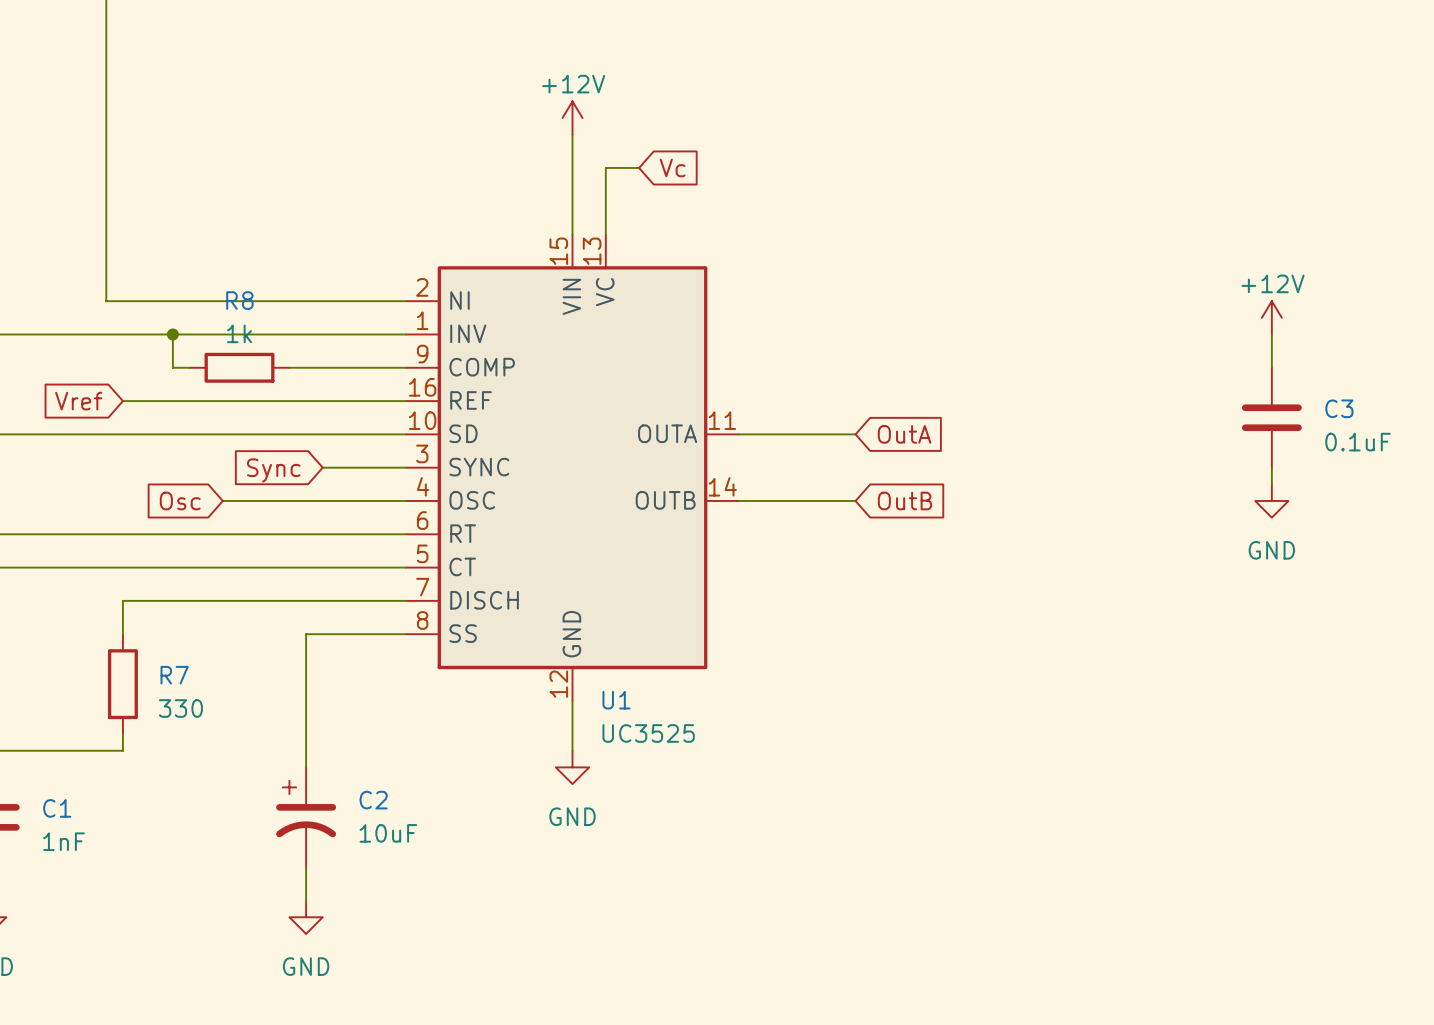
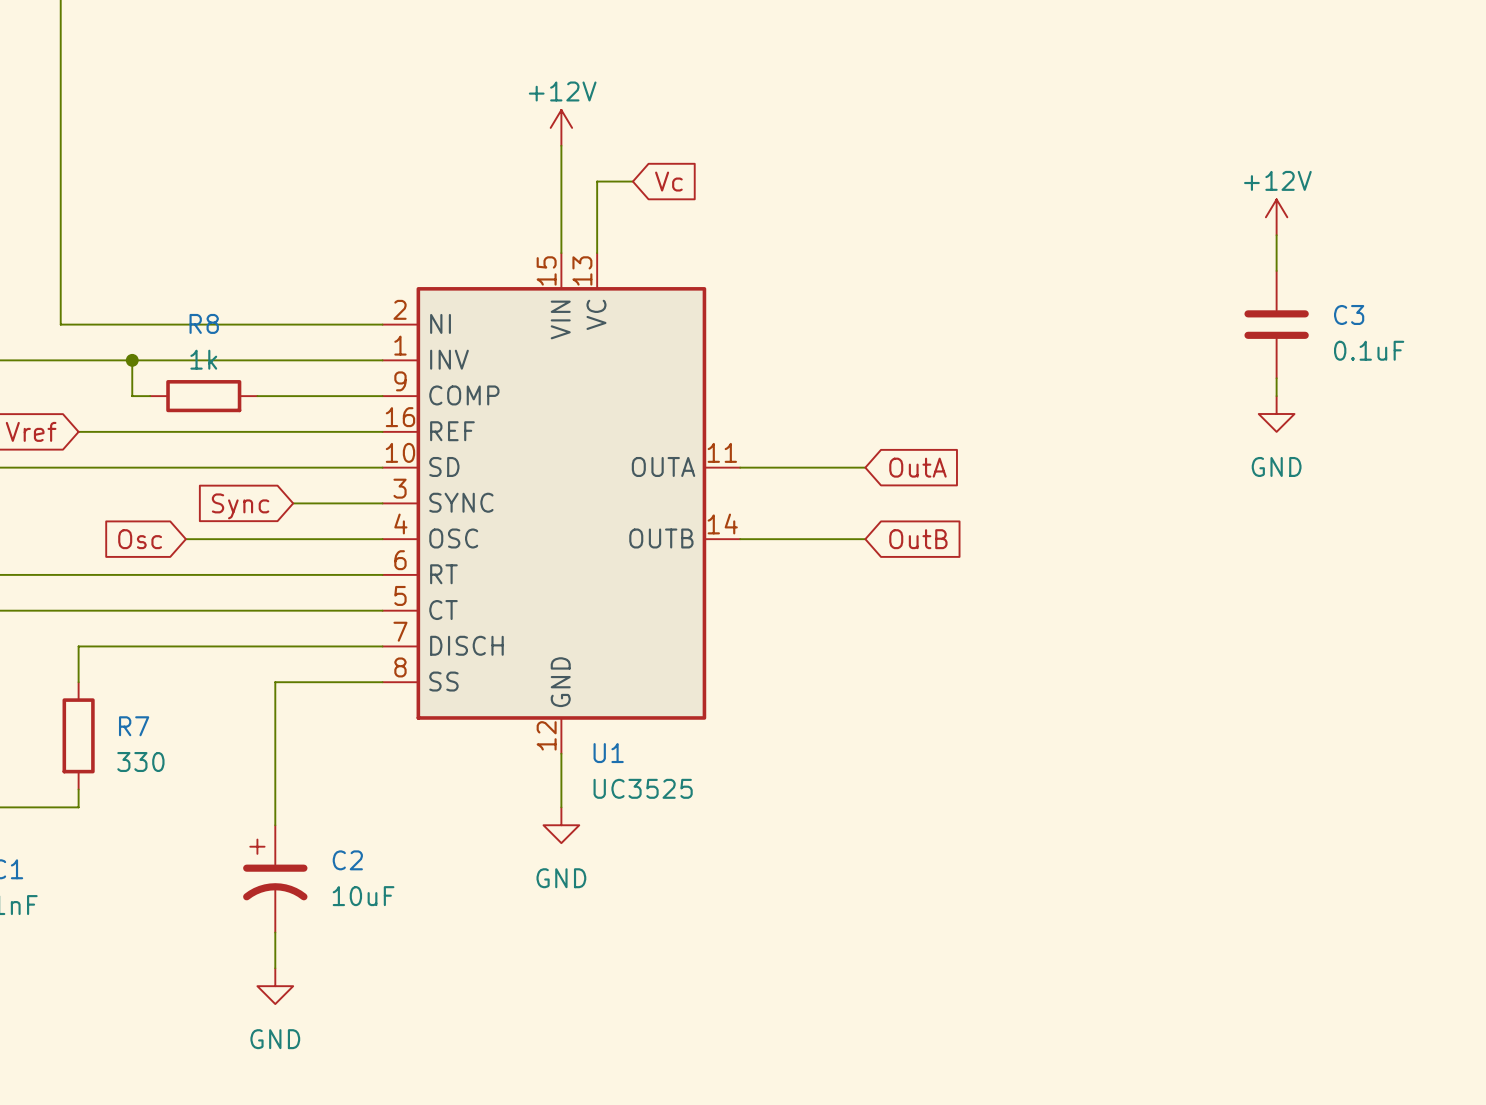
power symbol position: +12V (1271, 317) -> +12V (1276, 217)
wire: (1271, 334) (1271, 367) -> (1276, 235) (1276, 270)
C3 position: (1271, 417) -> (1276, 324)
wire: (1271, 467) (1271, 484) -> (1276, 378) (1276, 396)
power symbol position: GND (1271, 500) -> GND (1276, 414)

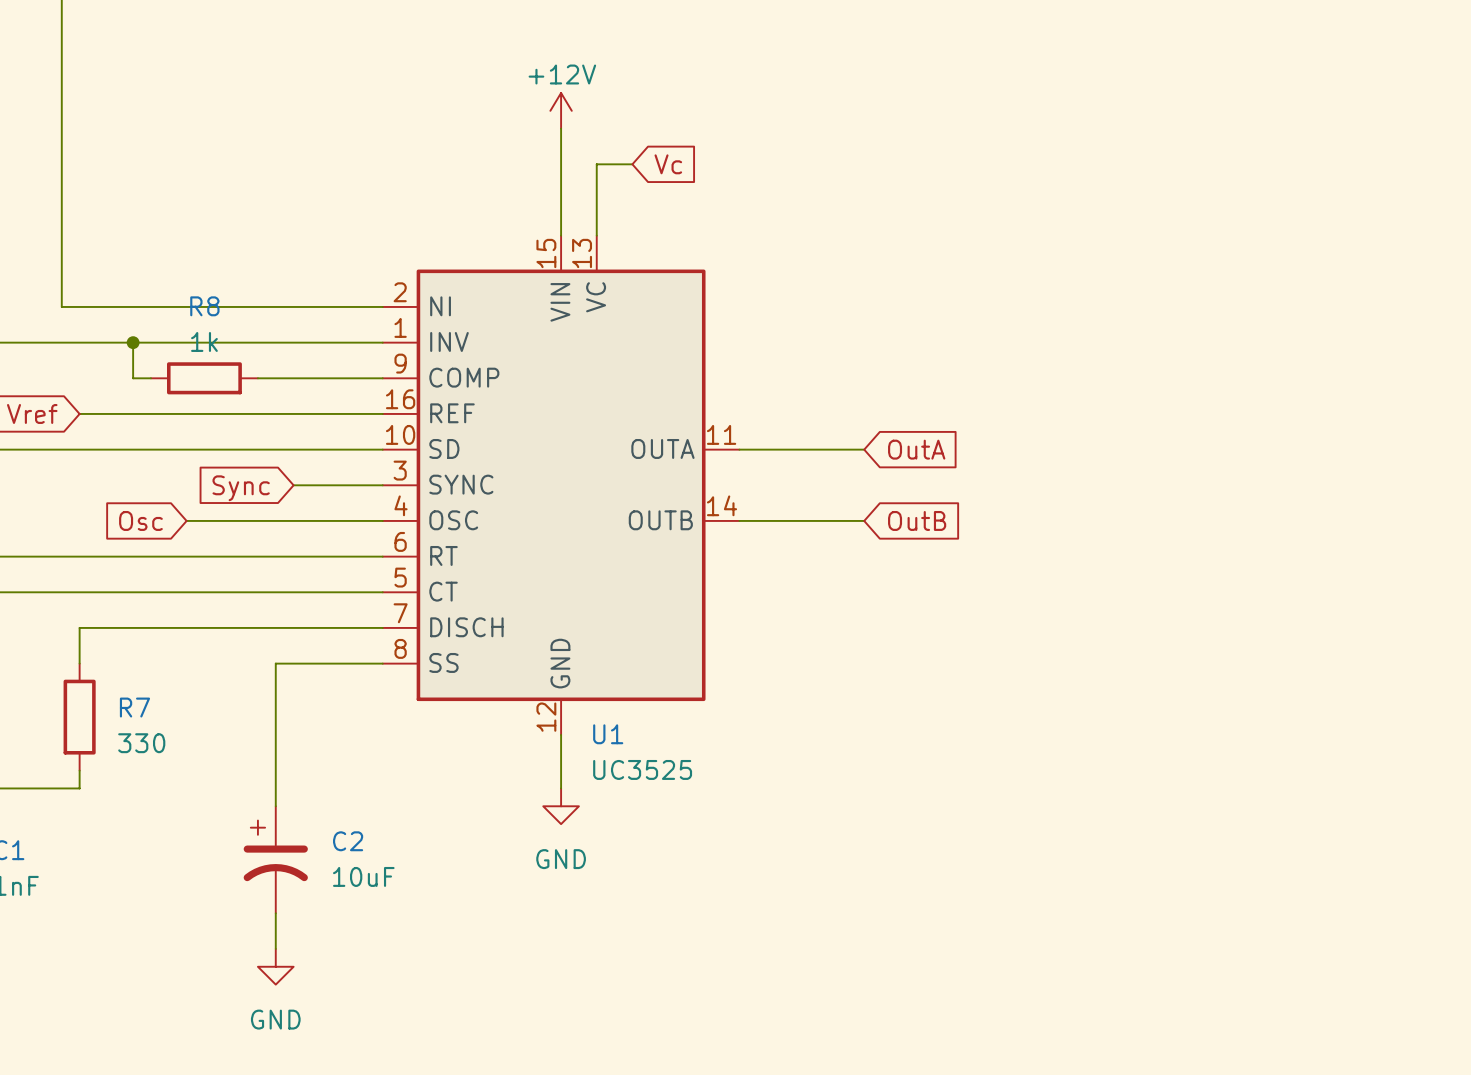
power symbol: +12V (1276, 217) -> none
wire: (1276, 235) (1276, 270) -> none
C3: 0.1uF (1276, 324) -> none
wire: (1276, 378) (1276, 396) -> none
power symbol: GND (1276, 414) -> none

